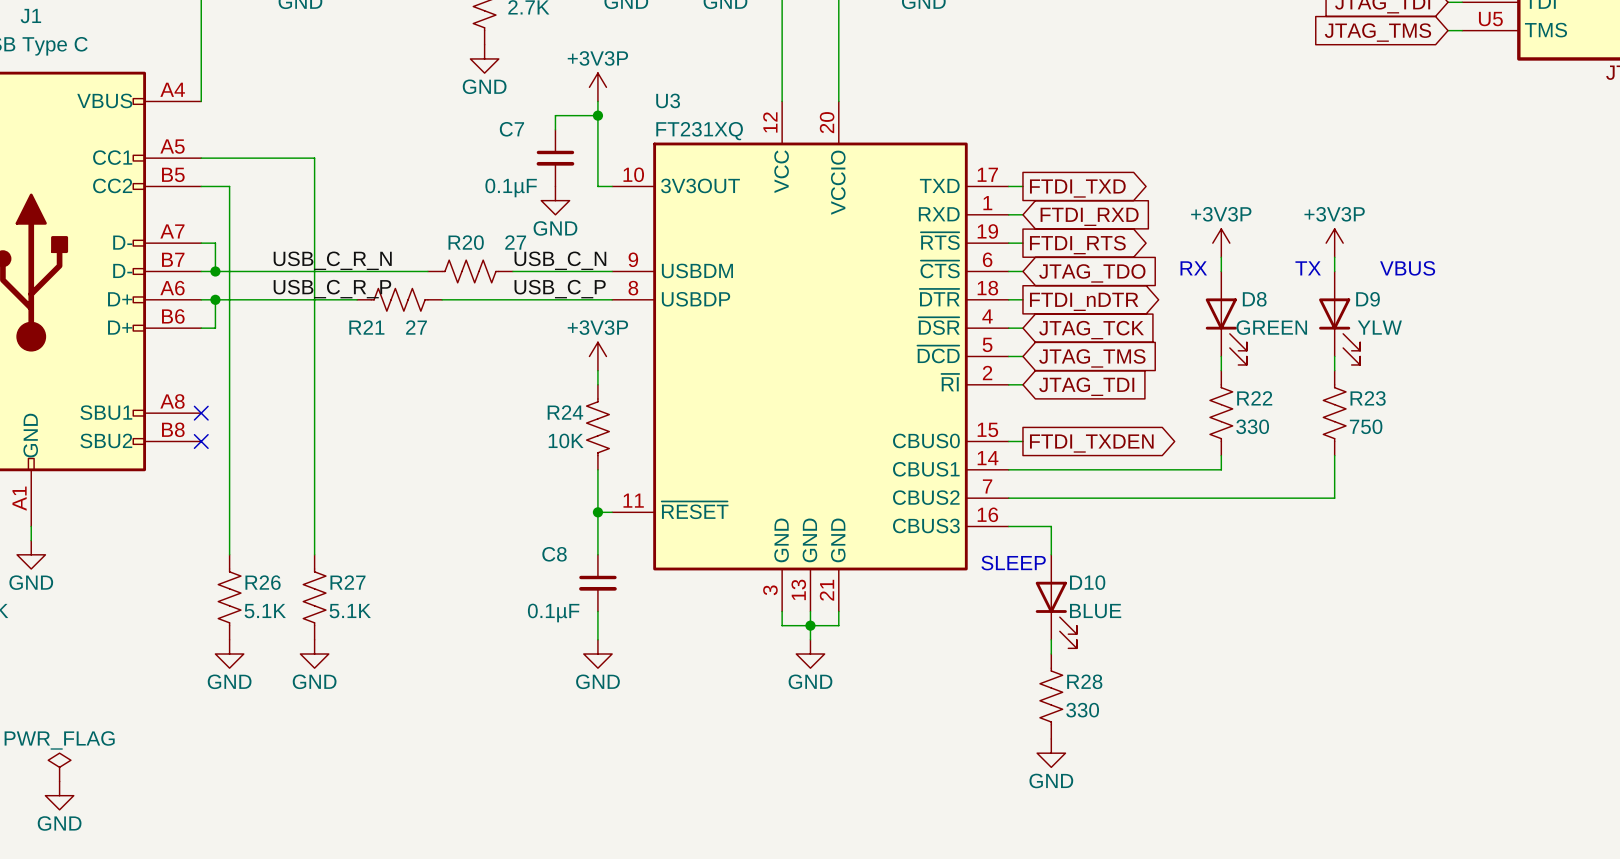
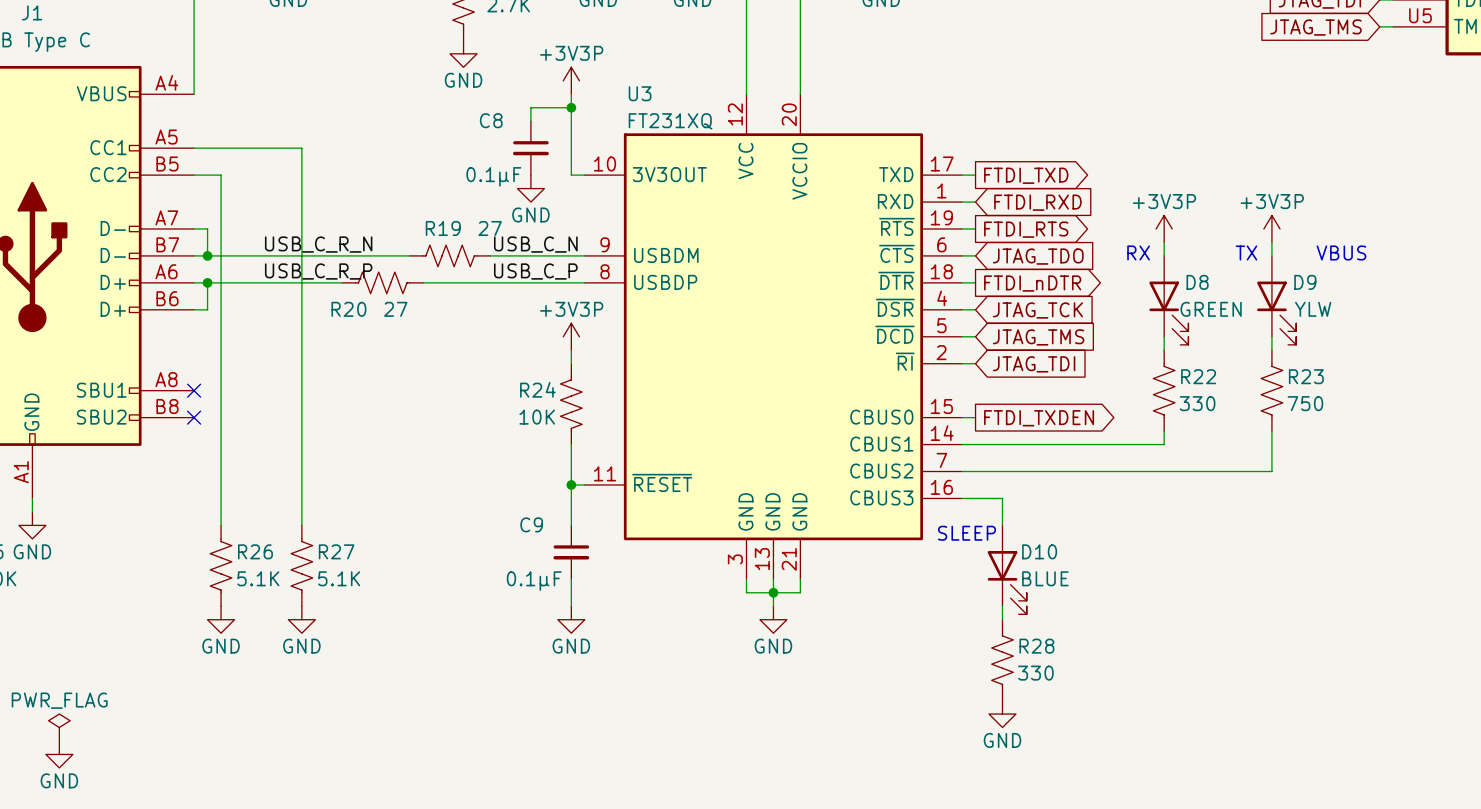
C7 name: C7 (511, 129) -> C8 (491, 120)
R20 name: R20 (466, 242) -> R19 (443, 228)
R21 name: R21 (366, 327) -> R20 (348, 309)
C8 name: C8 (554, 554) -> C9 (531, 524)

